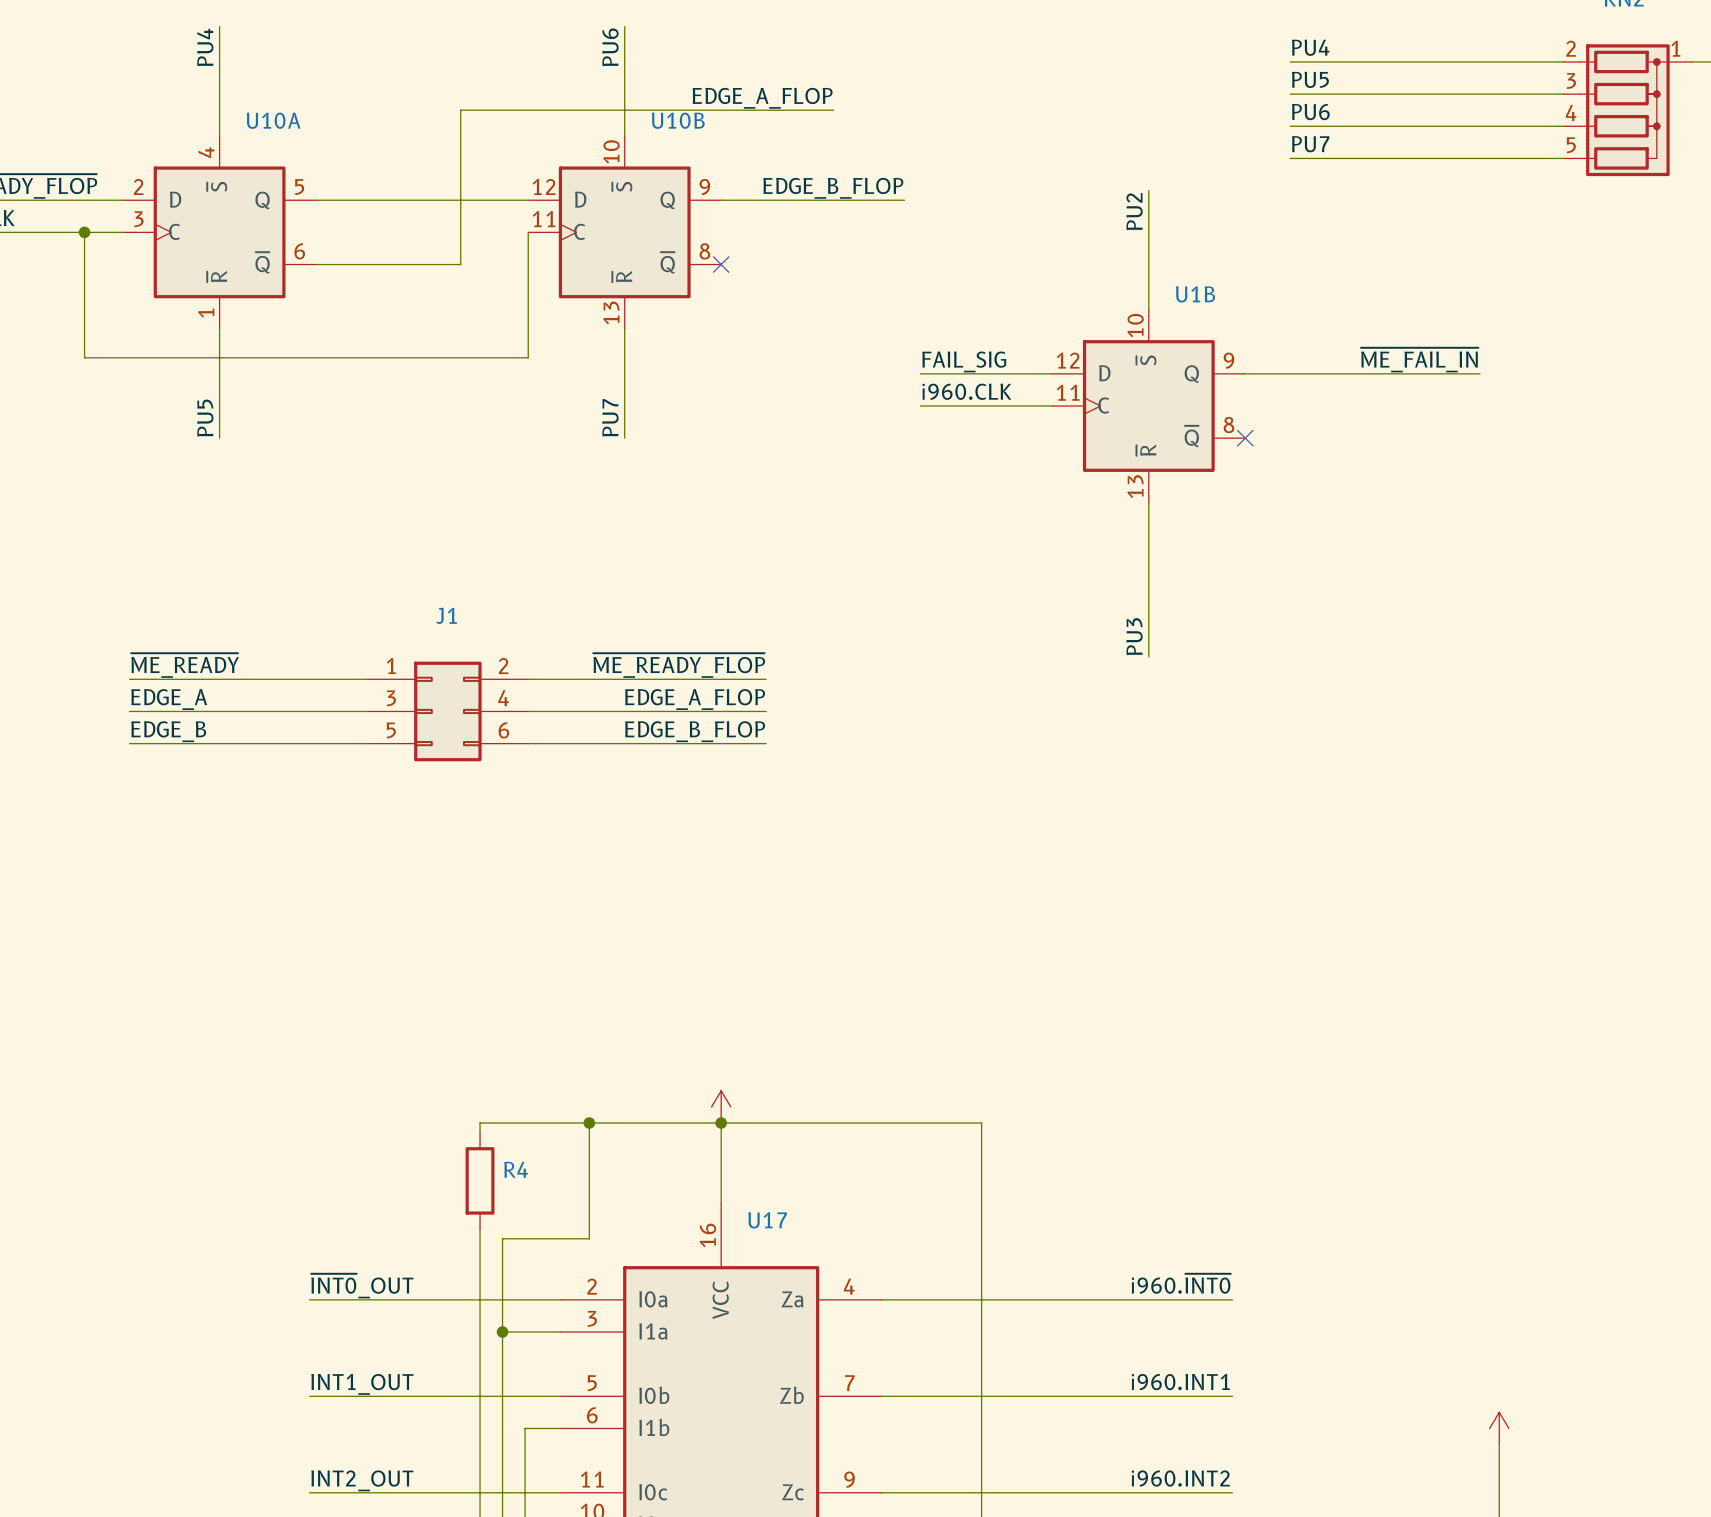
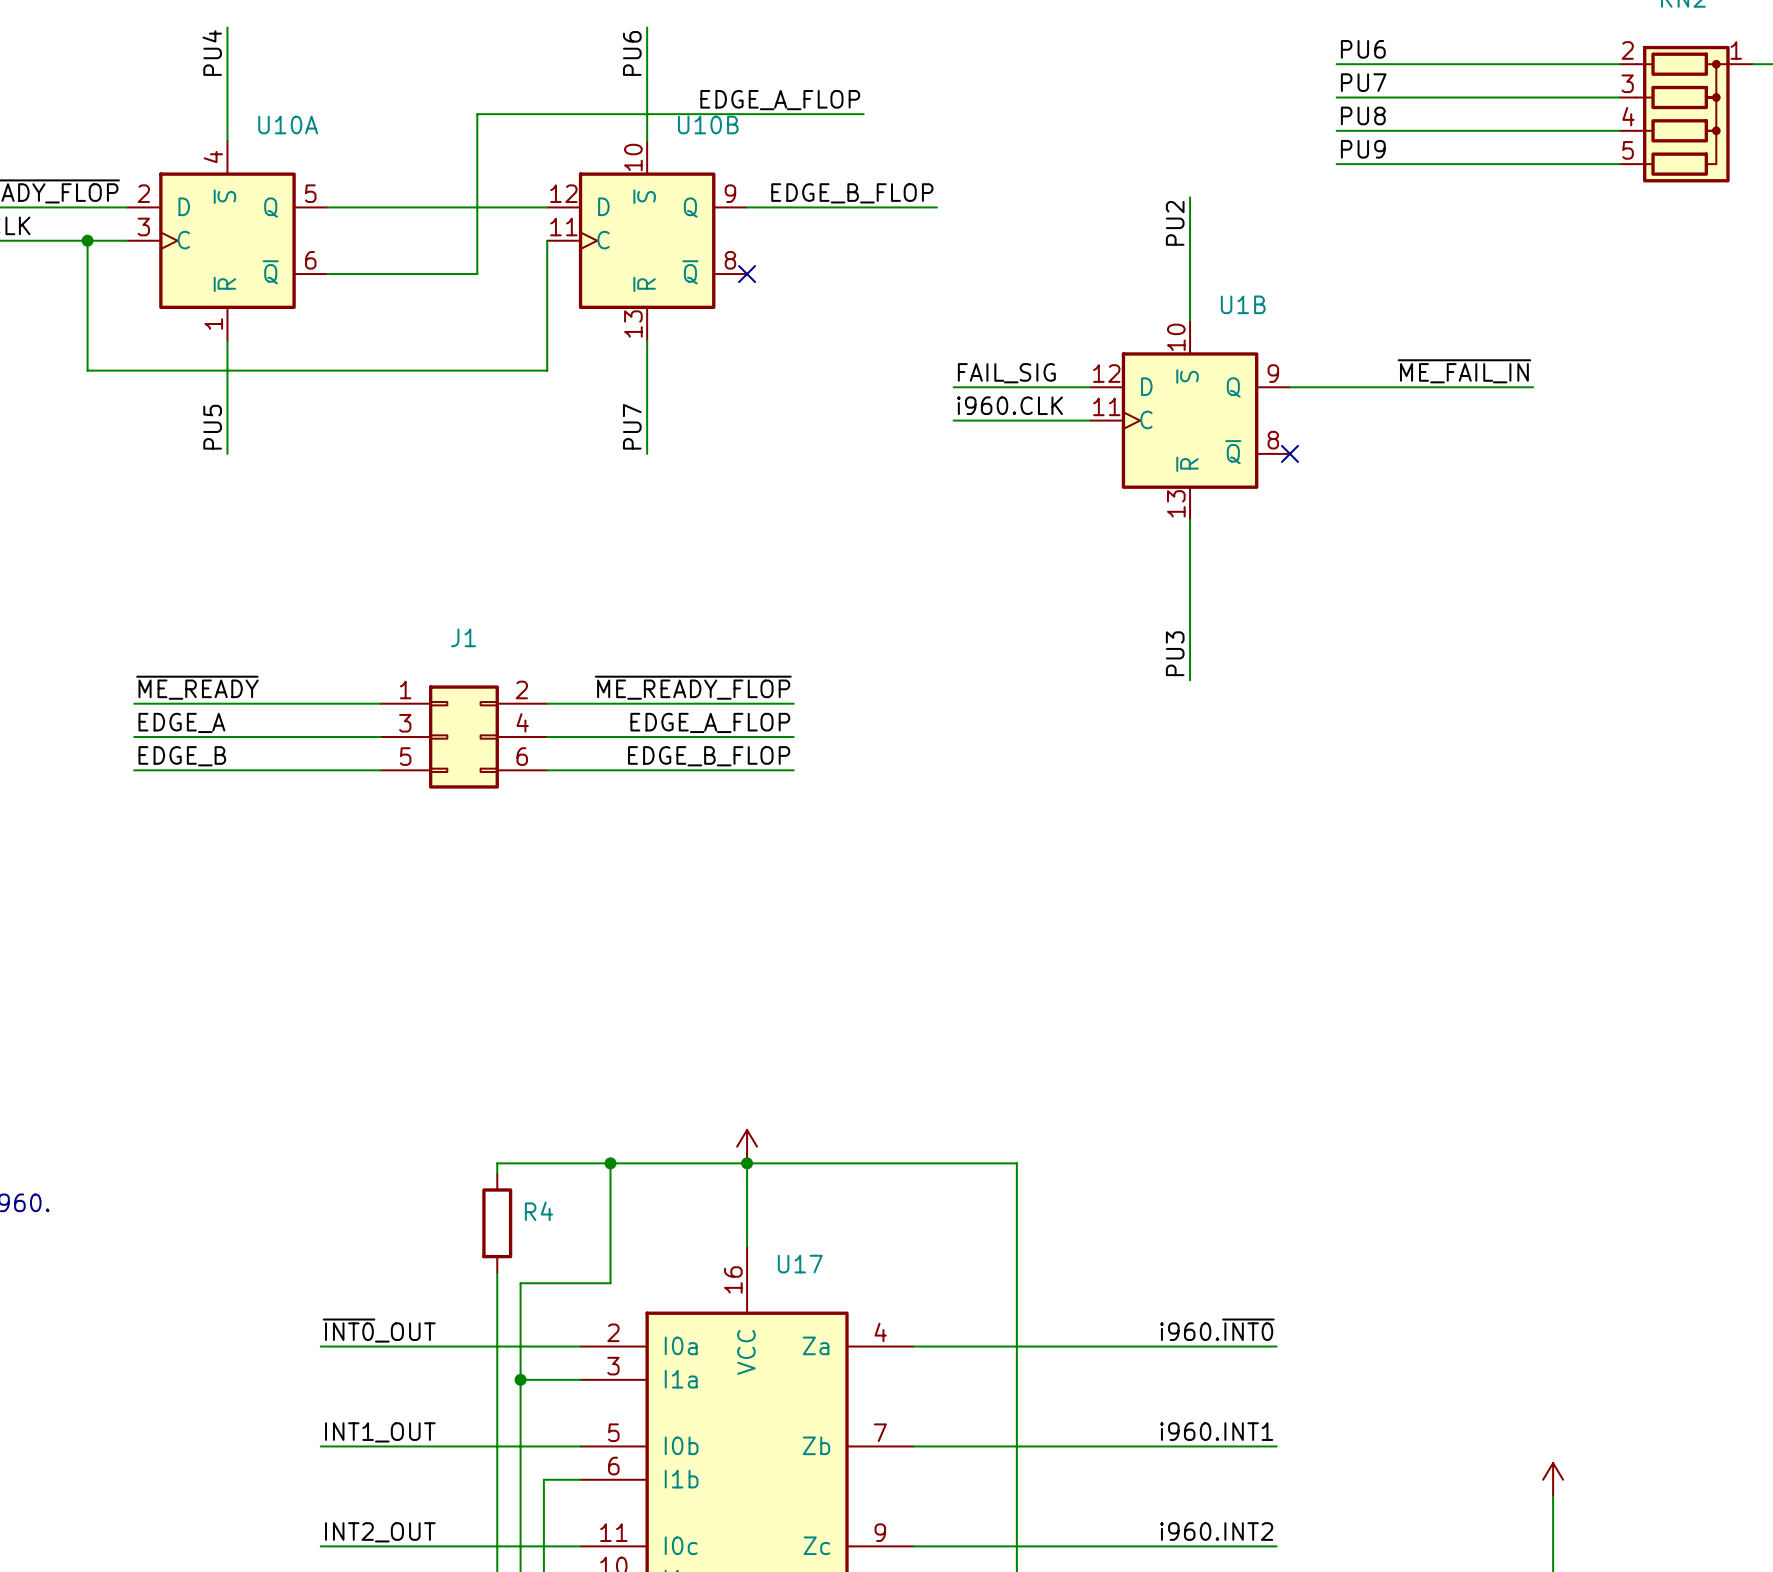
label: PU4 (1310, 47) -> PU6 (1363, 49)
label: PU5 (1310, 79) -> PU7 (1363, 82)
label: PU6 (1310, 112) -> PU8 (1363, 115)
label: PU7 (1310, 144) -> PU9 (1363, 149)

